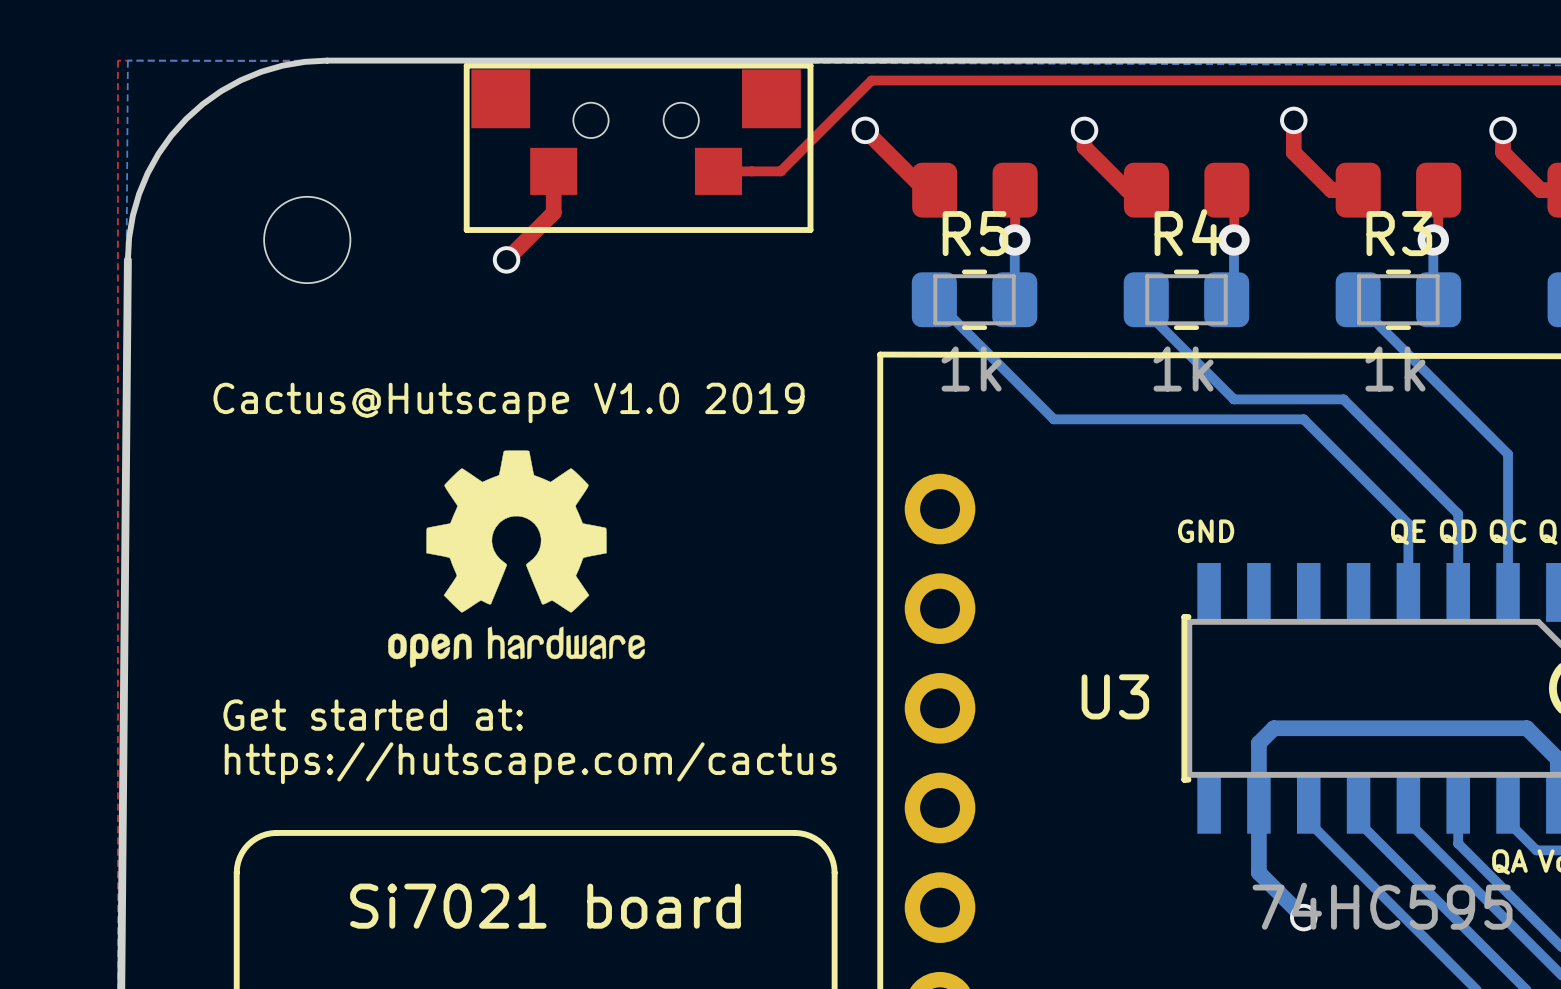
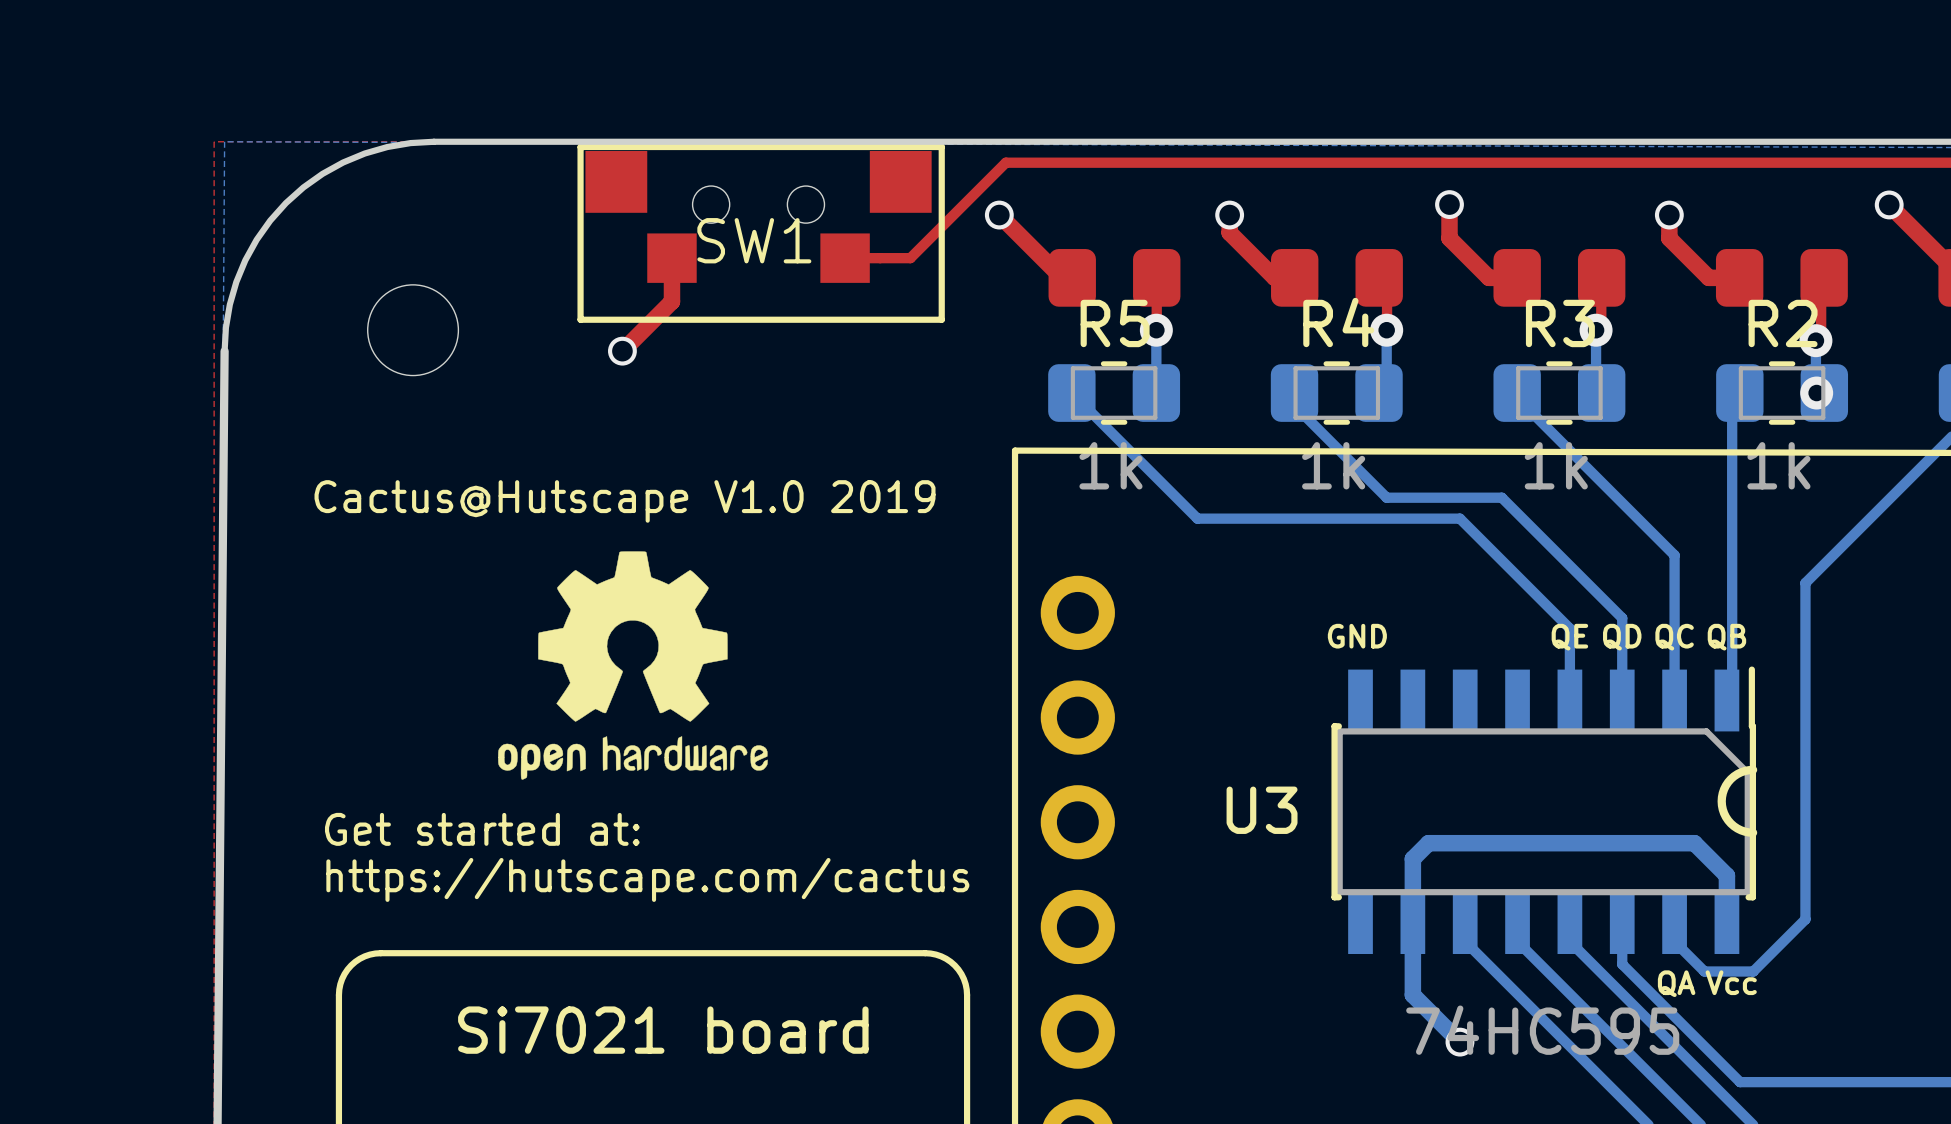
text: none -> SW1 (754, 240)

